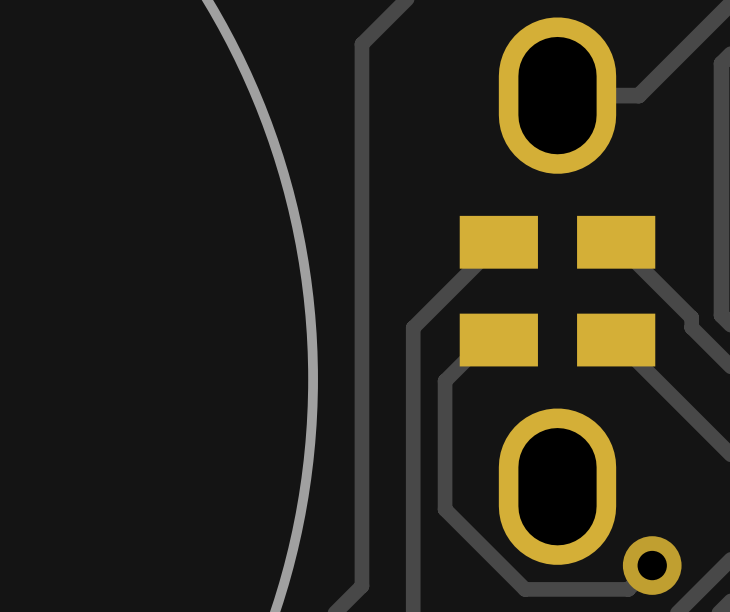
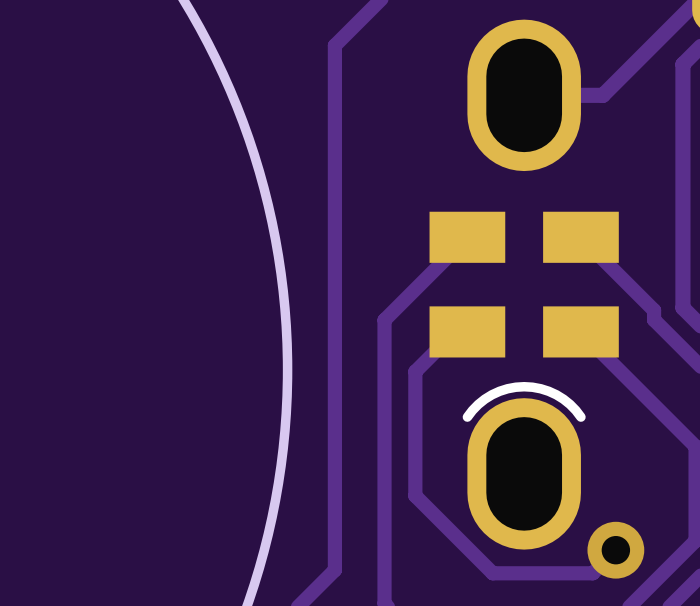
part footprint: [459, 17, 656, 565] -> [429, 19, 619, 550]

